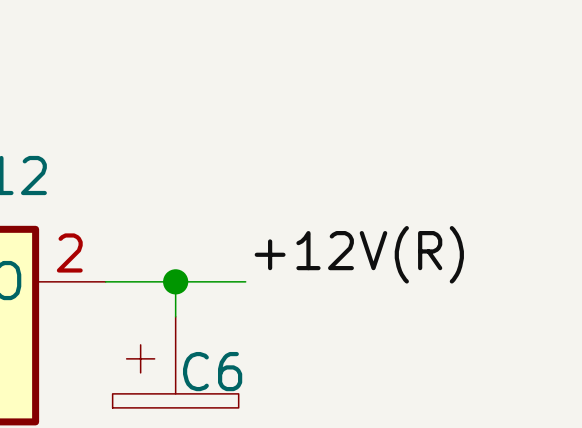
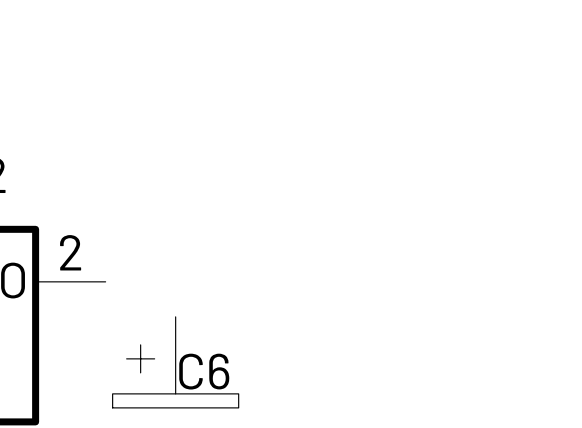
label: +12V(R) (359, 254) -> none
wire: (105, 281) (245, 281) -> none
wire: (175, 281) (175, 316) -> none
junction: (175, 281) -> none

